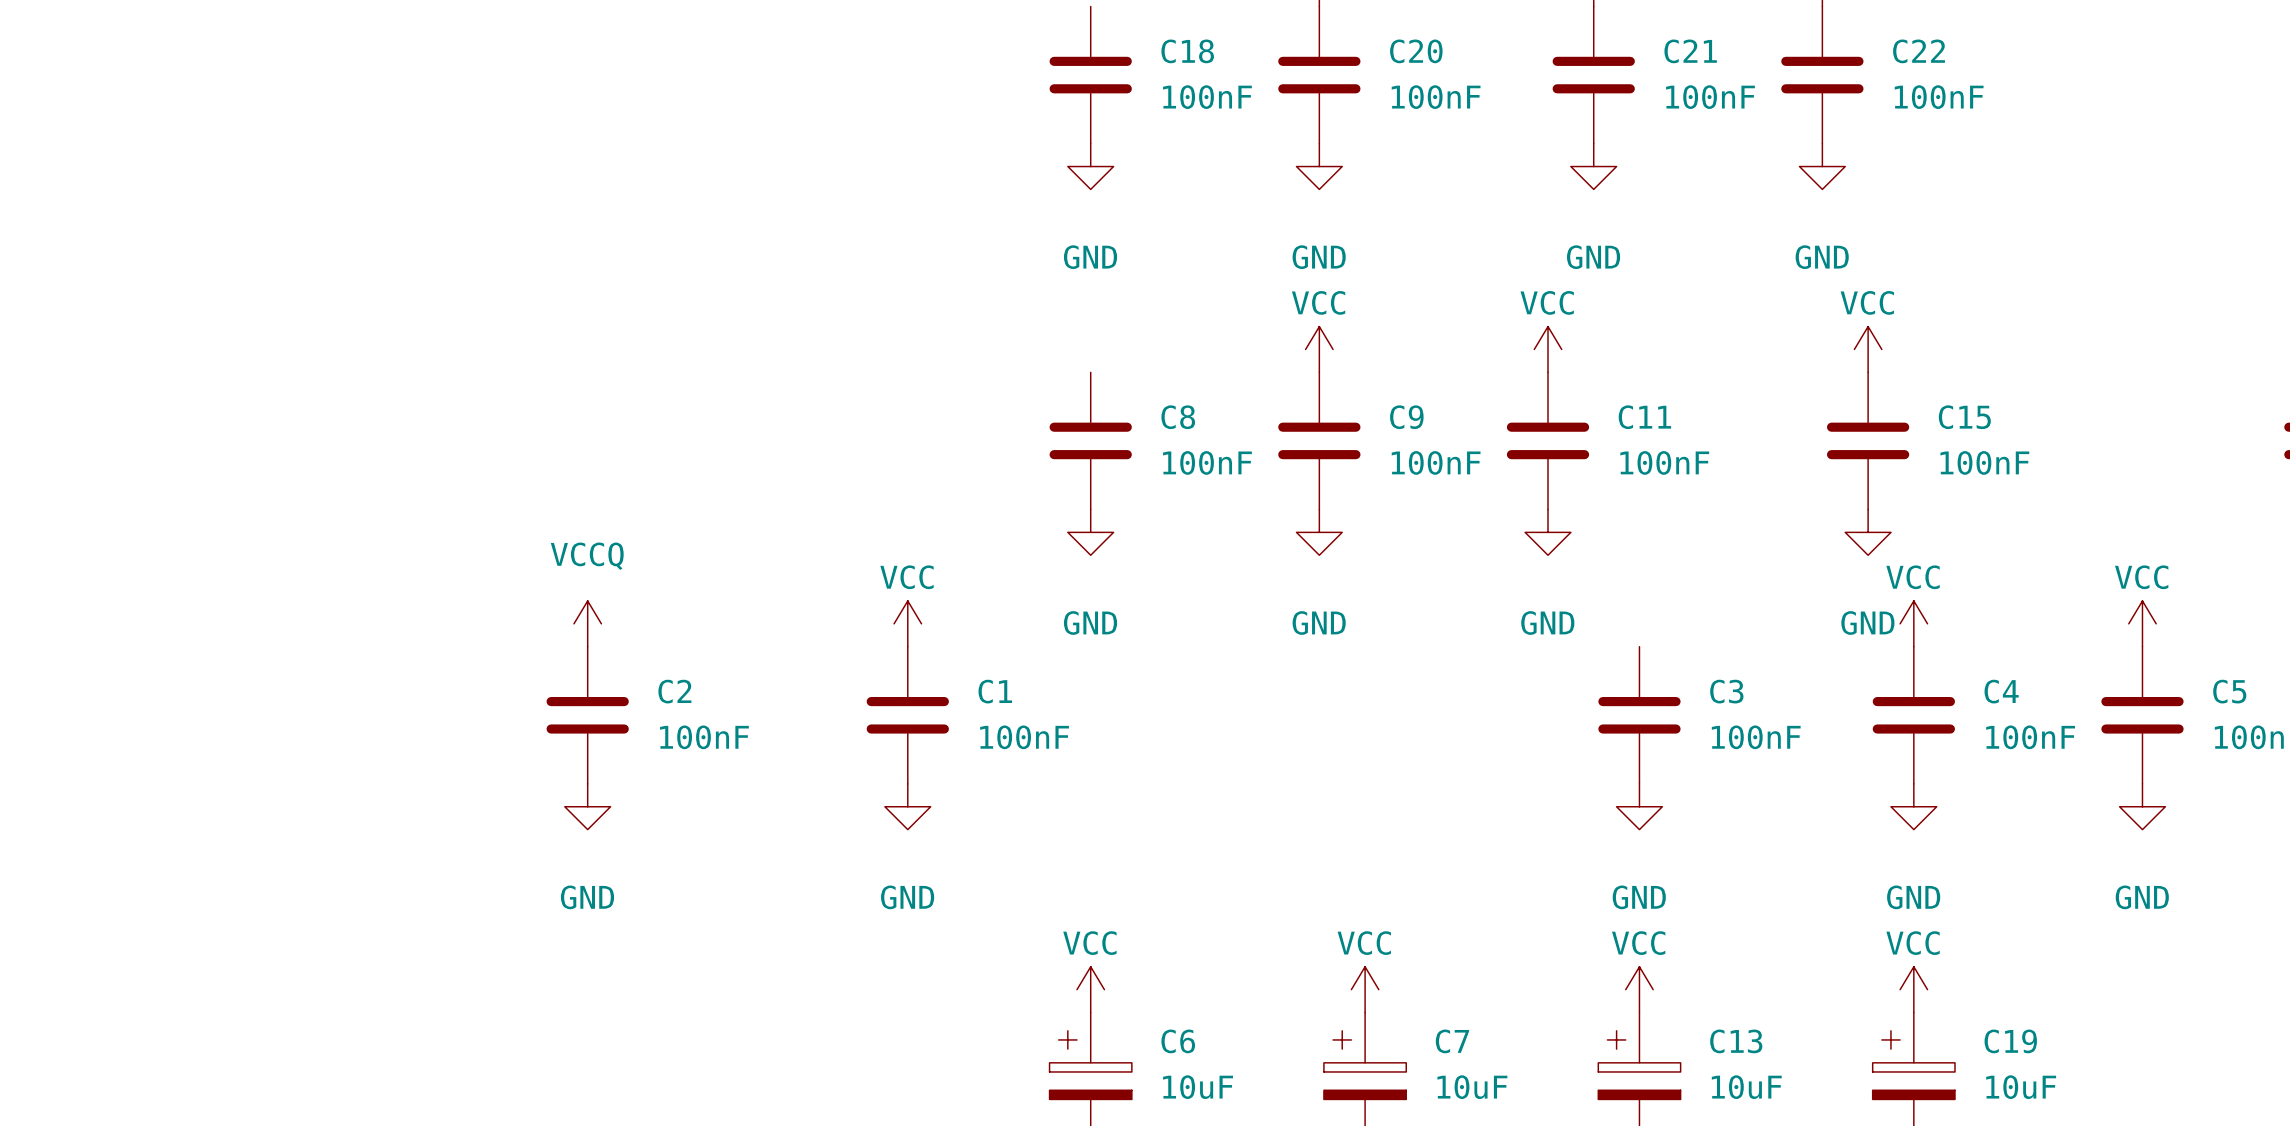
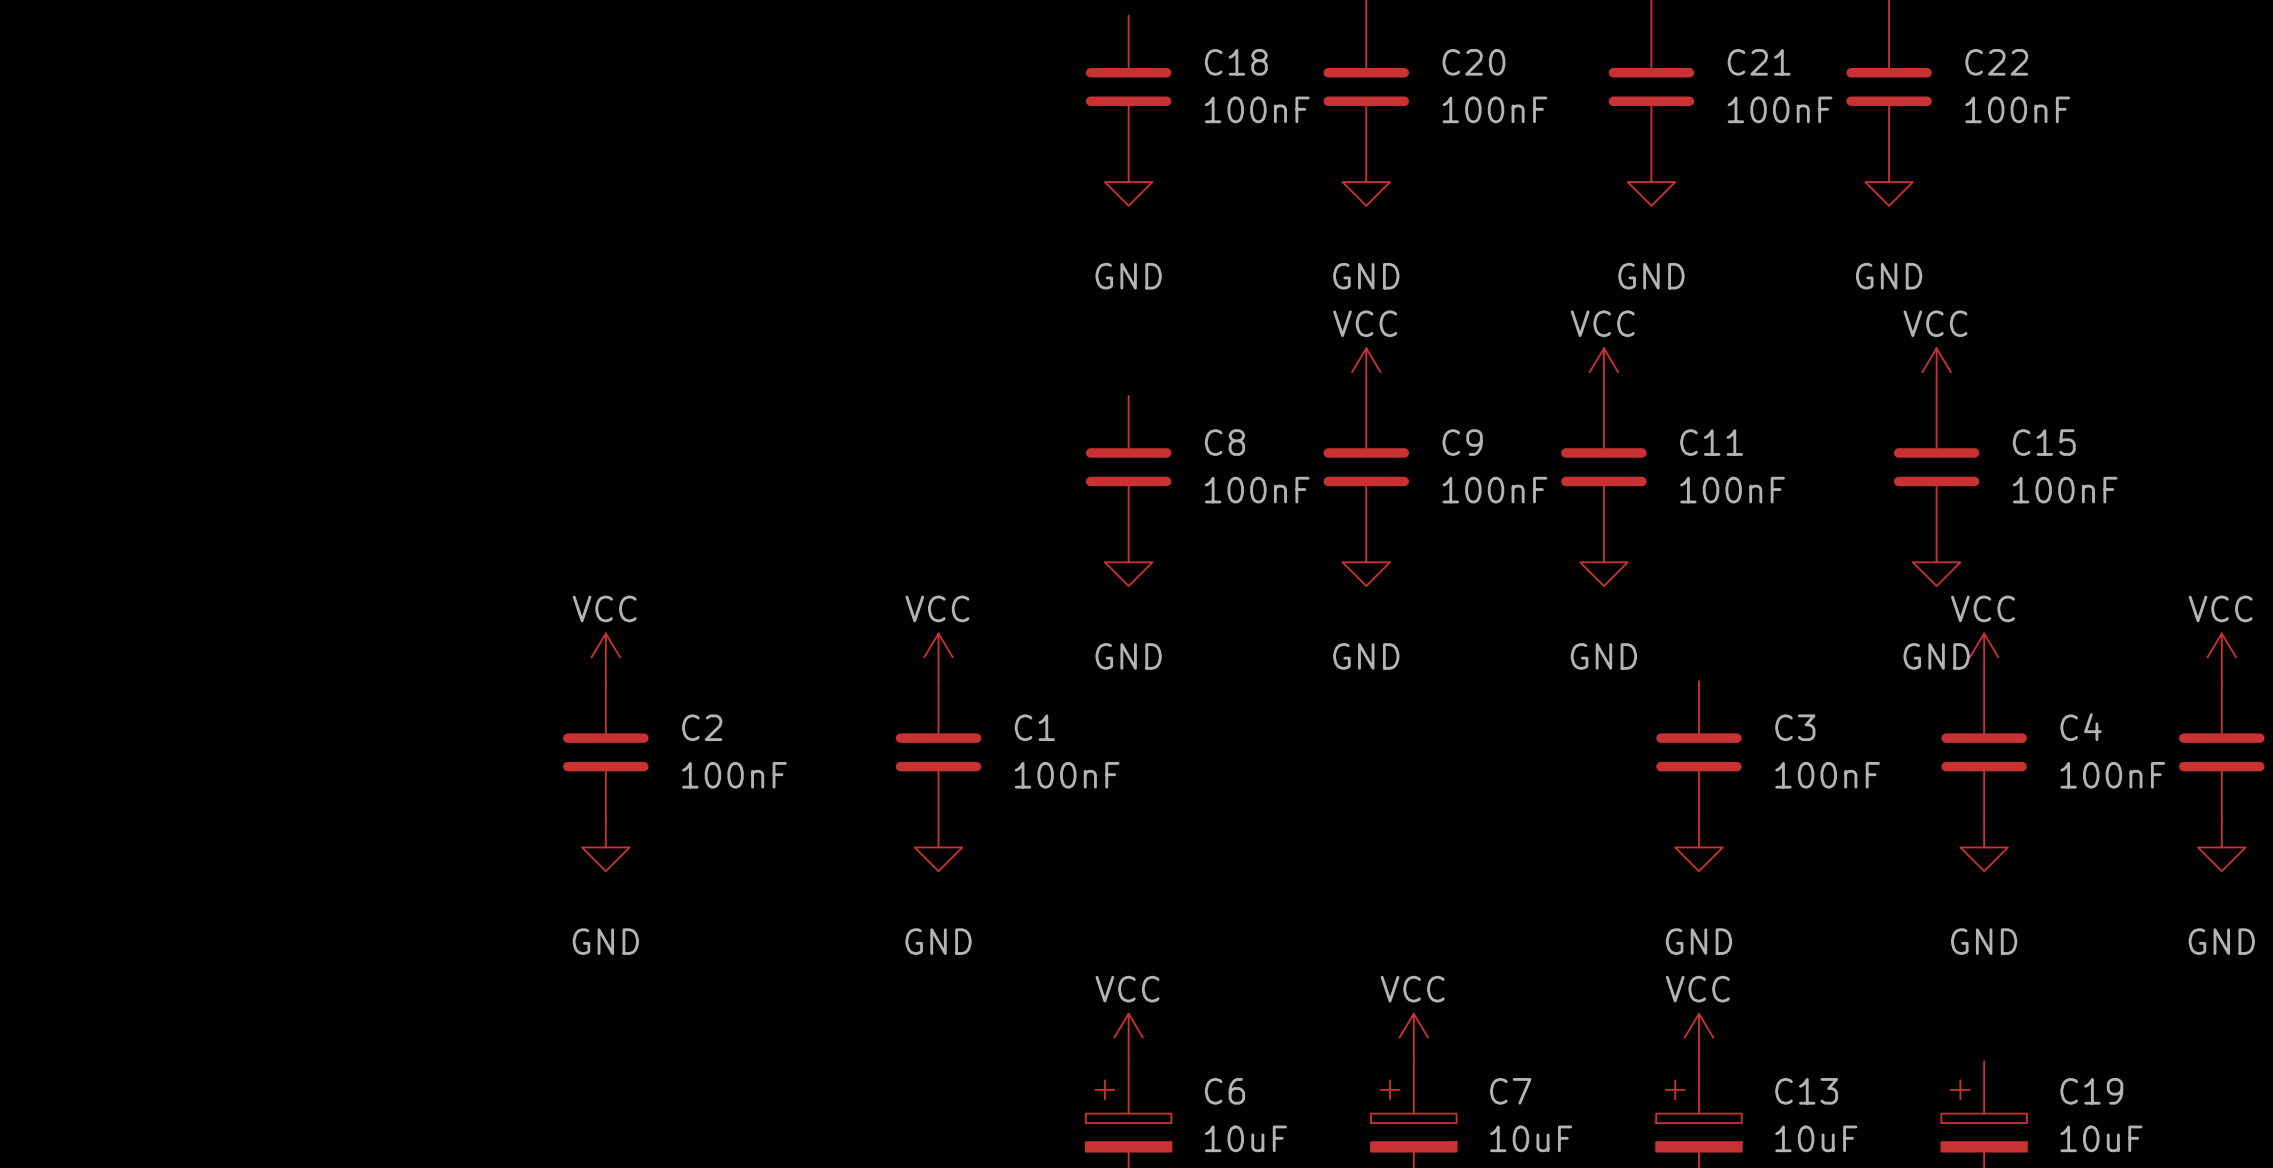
power symbol: VCCQ (587, 623) -> VCC (605, 657)
power symbol: VCC (1913, 989) -> none

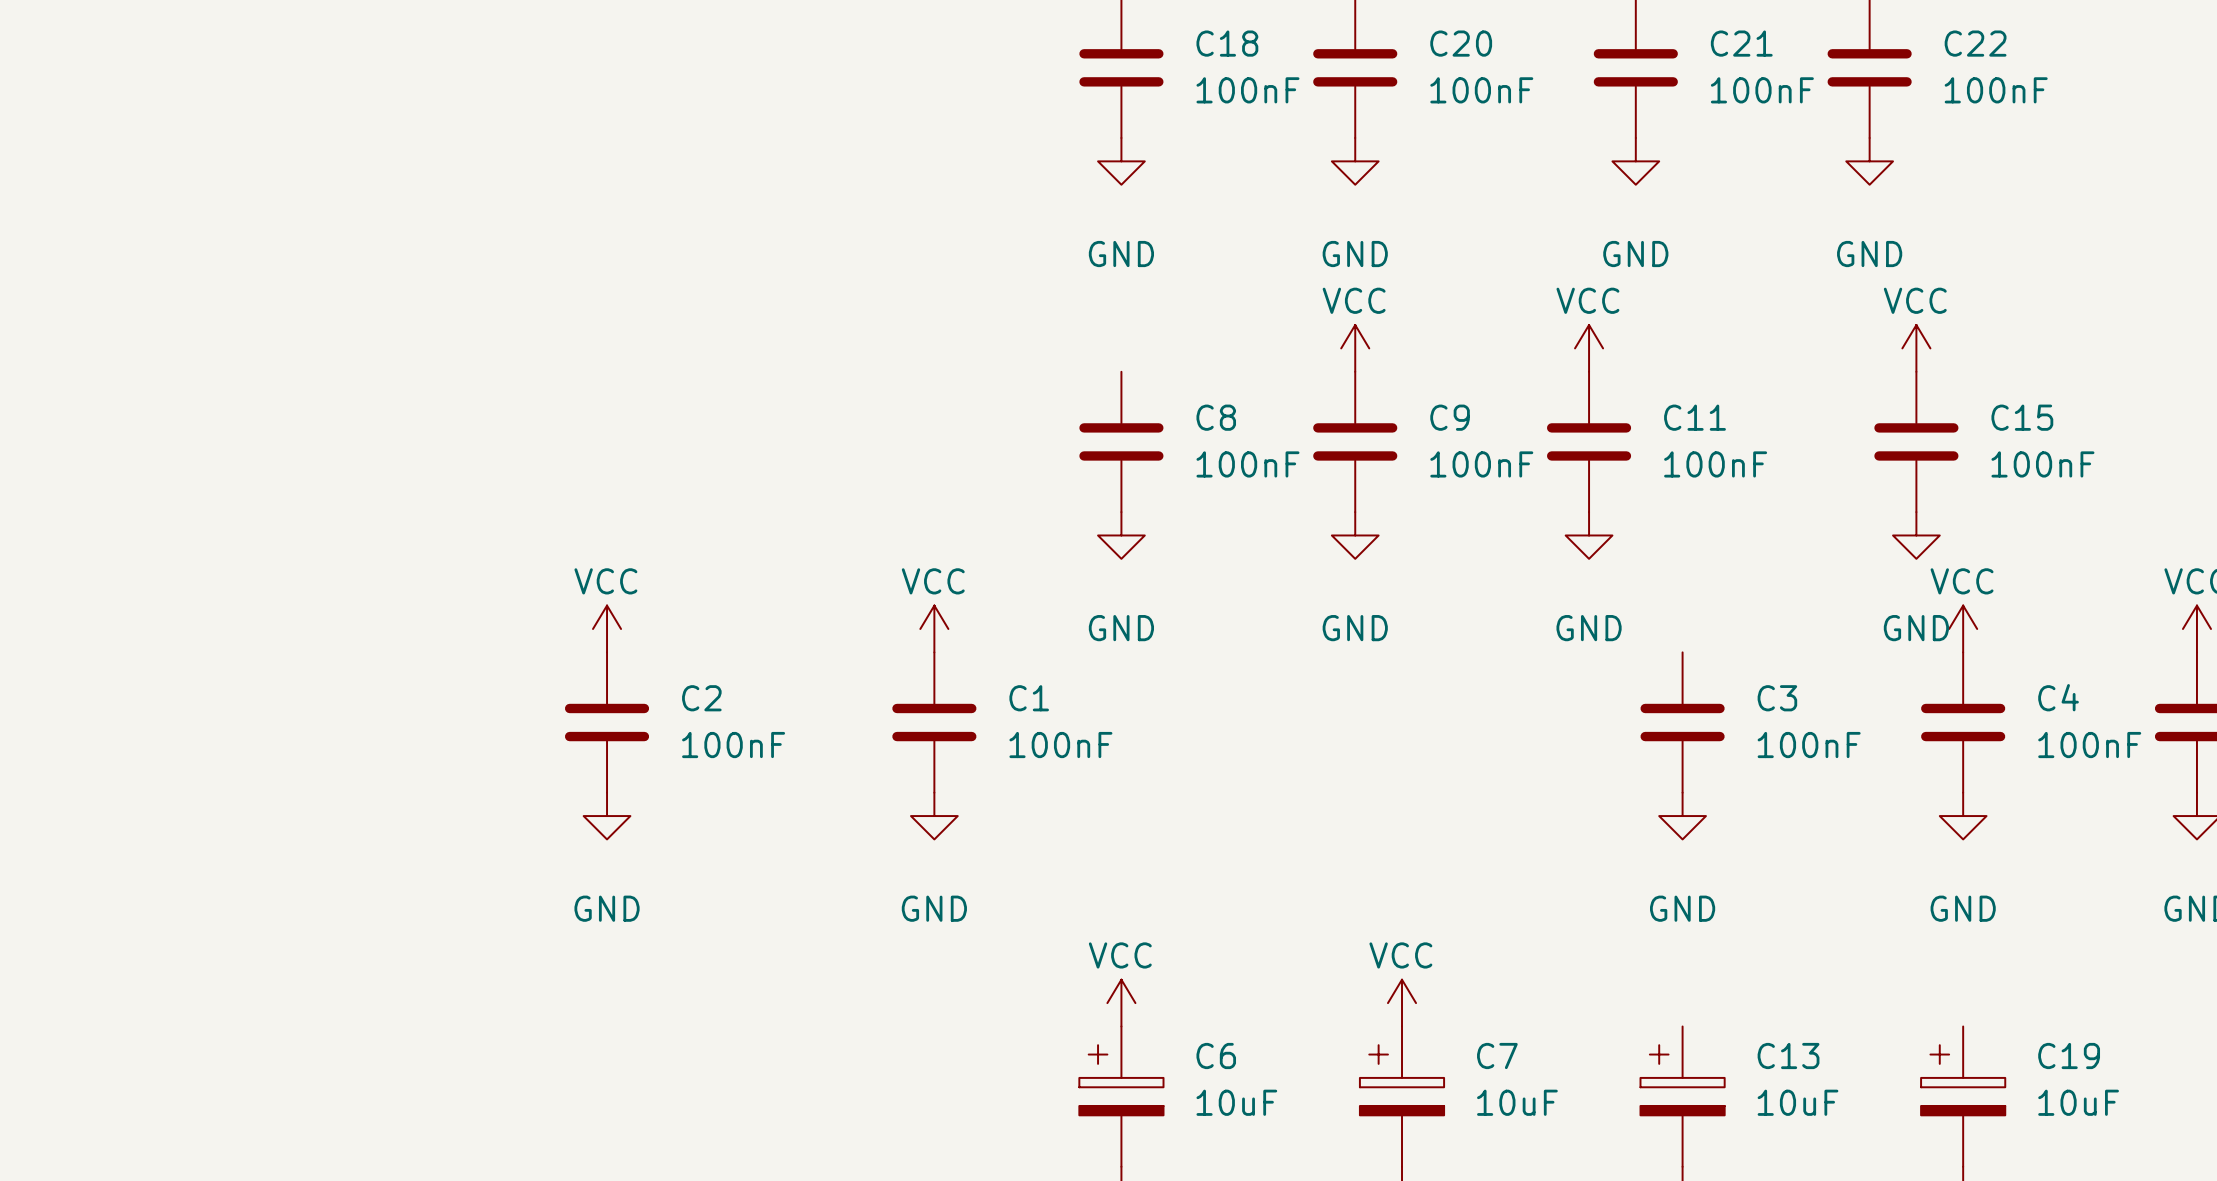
power symbol: VCC (1698, 1037) -> none

